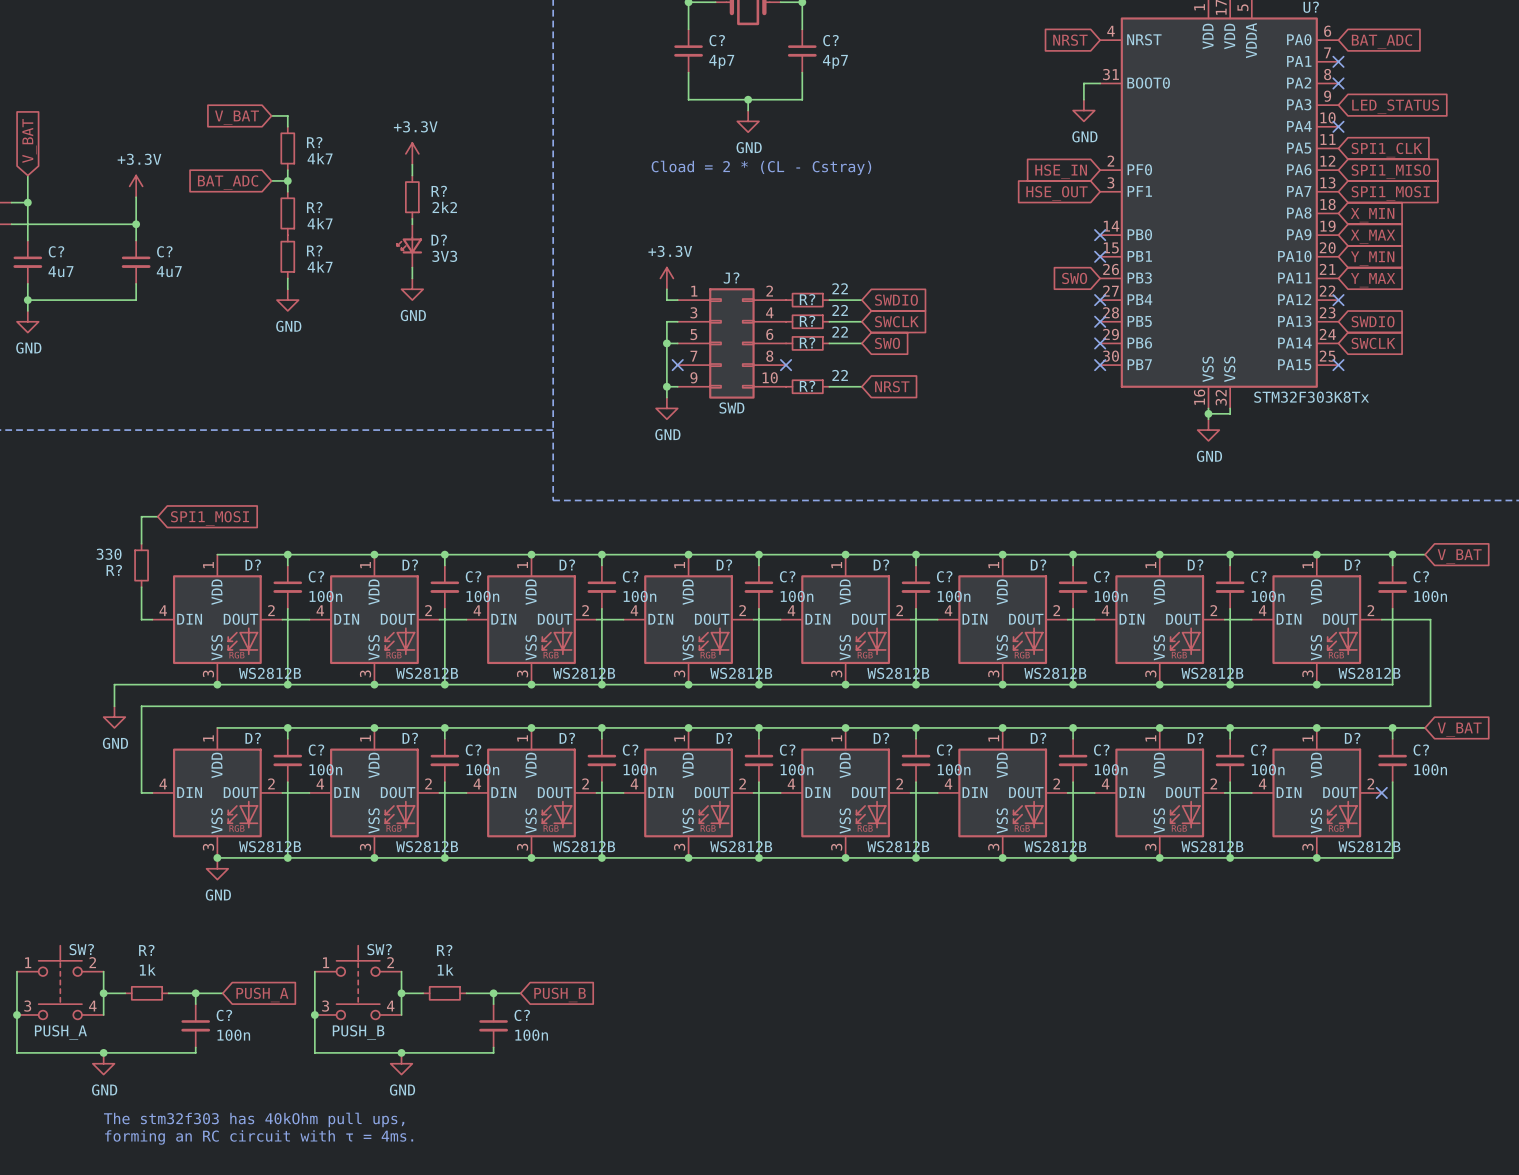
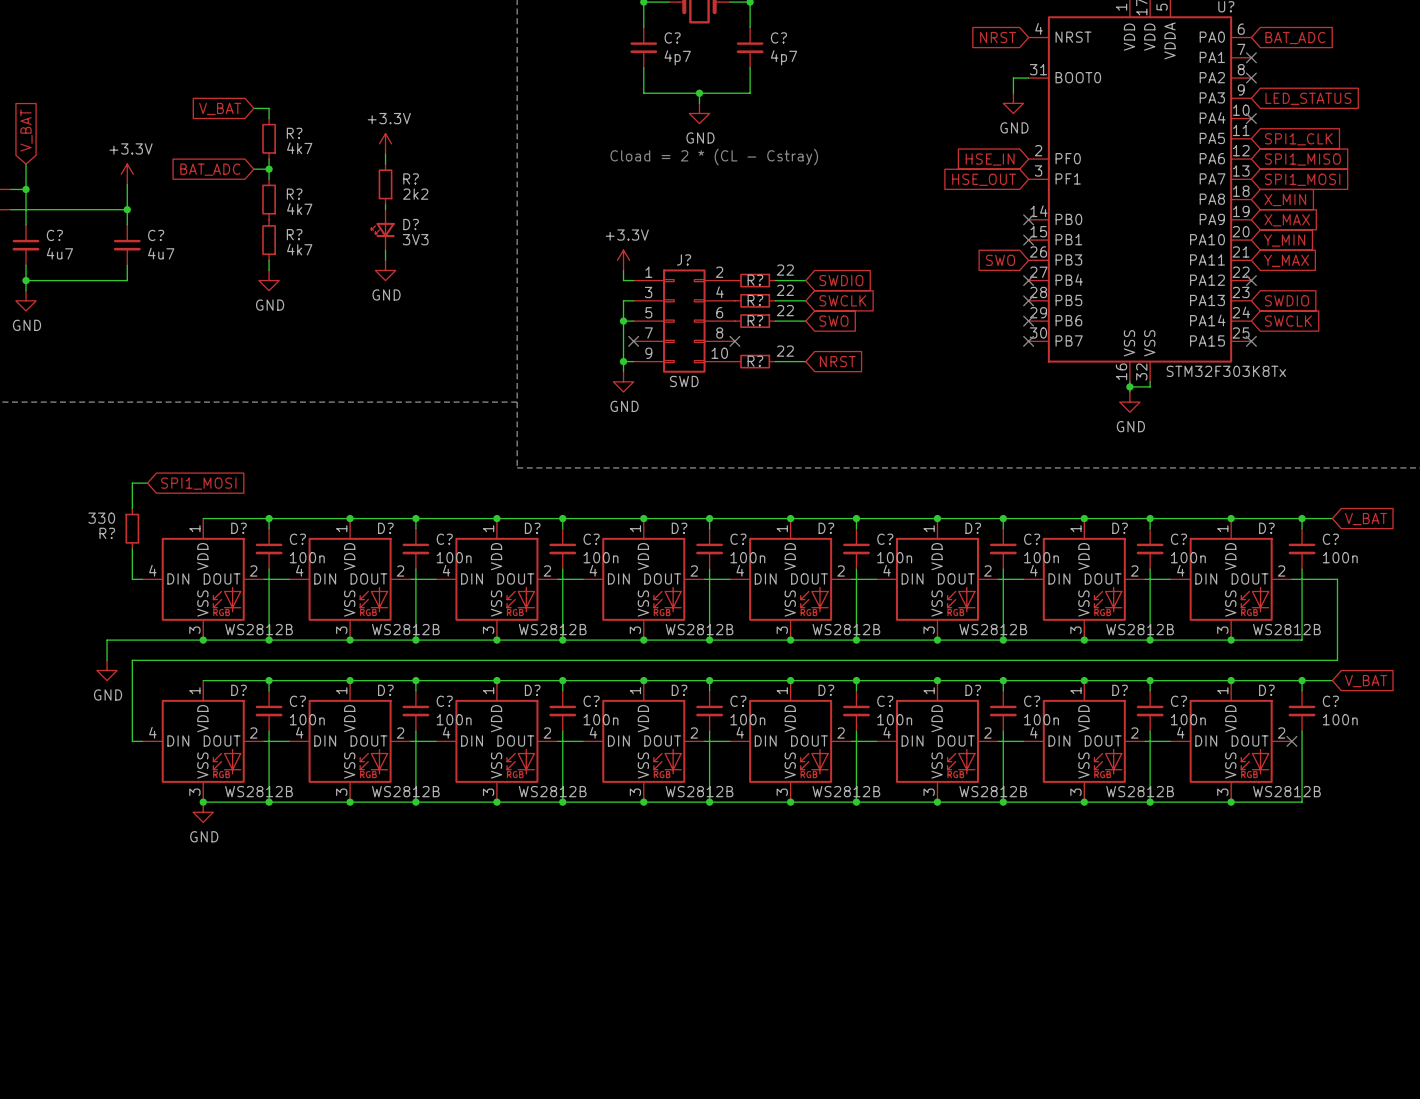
wire: (16, 971) (16, 1052) (195, 1052) (195, 1047) -> none
wire: (103, 971) (103, 1014) -> none
wire: (314, 971) (314, 1052) (493, 1052) (493, 1047) -> none
wire: (401, 971) (401, 1014) -> none
SW?: PUSH_A (60, 982) -> none
SW?: PUSH_B (358, 982) -> none
wire: (103, 993) (125, 993) -> none
junction: (103, 993) -> none
R?: 1k (146, 993) -> none
wire: (168, 993) (222, 993) -> none
wire: (195, 993) (195, 1004) -> none
junction: (195, 993) -> none
wire: (401, 993) (423, 993) -> none
junction: (401, 993) -> none
R?: 1k (444, 993) -> none
wire: (466, 993) (520, 993) -> none
wire: (493, 993) (493, 1004) -> none
junction: (493, 993) -> none
global label: PUSH_A (262, 994) -> none
global label: PUSH_B (560, 994) -> none
junction: (16, 1014) -> none
junction: (314, 1014) -> none
C?: 100n (195, 1025) -> none
C?: 100n (493, 1025) -> none
junction: (103, 1052) -> none
junction: (401, 1052) -> none
power symbol: GND (103, 1063) -> none
power symbol: GND (401, 1063) -> none
text: The stm32f303 has 40kOhm pull ups, (254, 1119) -> none
text: forming an RC circuit with τ = 4ms. (259, 1137) -> none

